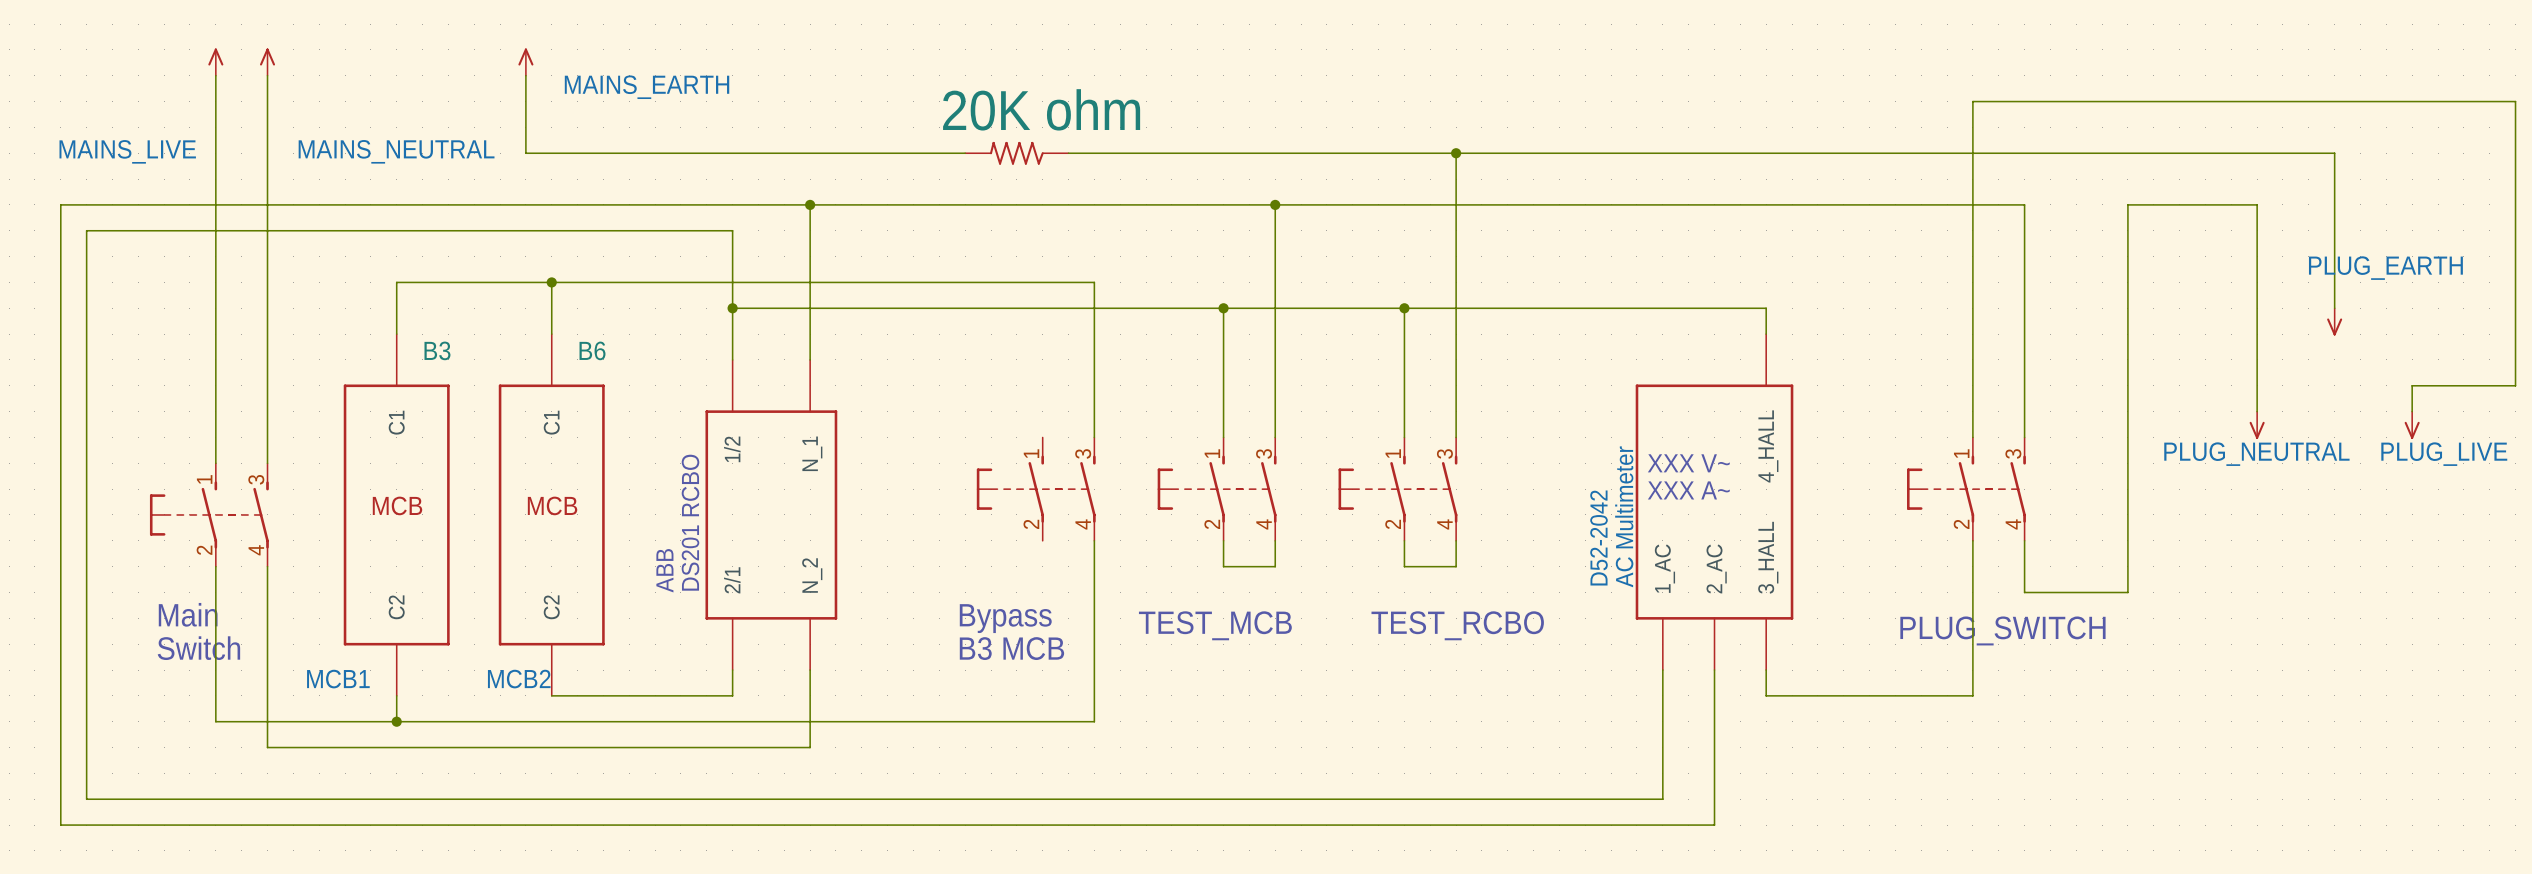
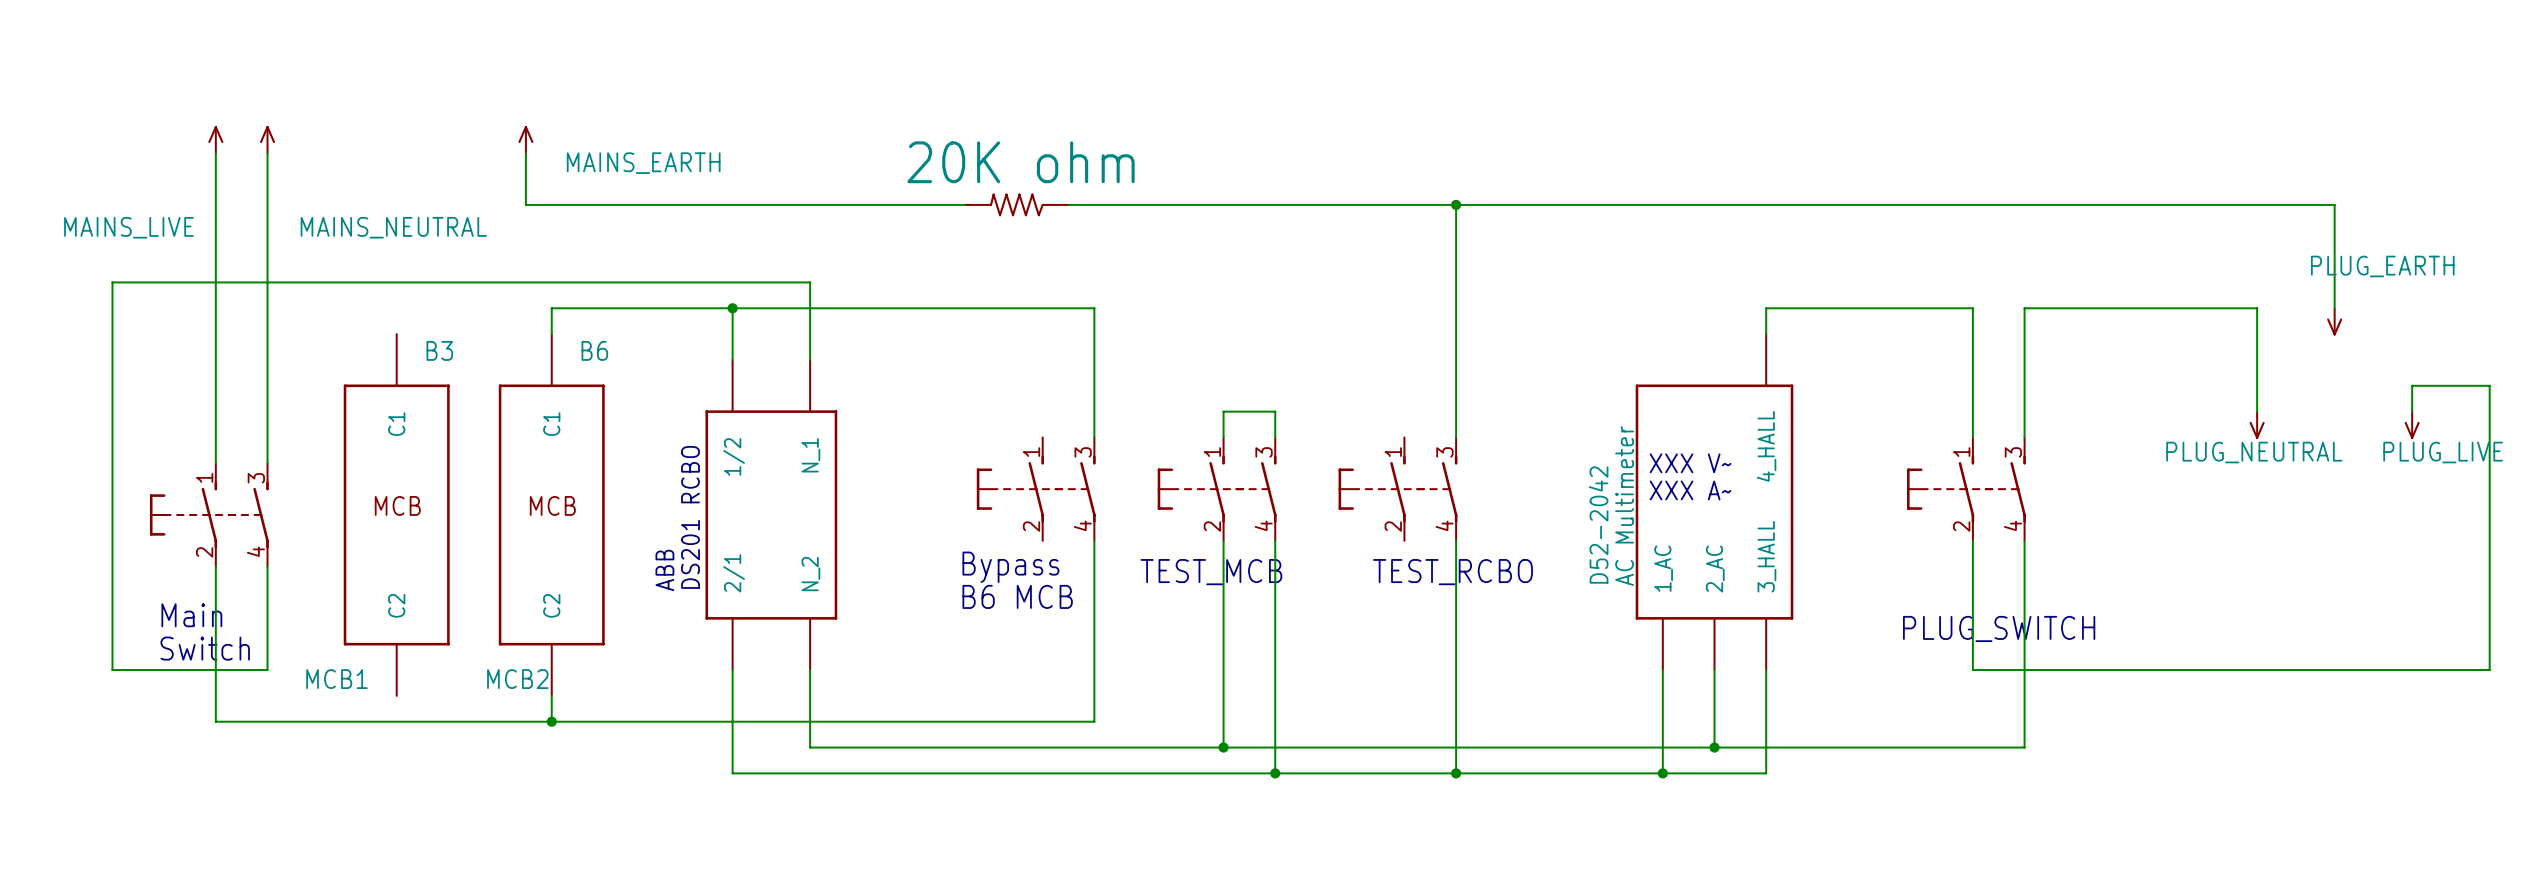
MAINS_LIVE position: (215, 62) -> (215, 139)
MAINS_NEUTRAL position: (267, 62) -> (267, 139)
MAINS_EARTH position: (525, 62) -> (525, 139)
wire: (215, 75) (215, 153) -> none
wire: (267, 75) (267, 153) -> none
wire: (525, 75) (525, 153) (965, 153) -> none
part position: (1016, 153) -> (1016, 204)
wire: (1068, 153) (2334, 153) (2334, 204) -> none
wire: (1456, 153) (1456, 204) -> none
junction position: (1456, 153) -> (1456, 204)
wire: (525, 204) (60, 204) (60, 825) (1714, 825) (1714, 747) -> (525, 204) (525, 153)
wire: (810, 204) (810, 282) (1094, 282) (1094, 308) (1766, 308) -> (1972, 308) (1766, 308)
junction: (810, 204) -> none
wire: (1275, 204) (1275, 411) -> none
junction: (1275, 204) -> none
wire: (2024, 204) (2024, 308) -> (2024, 204) (2127, 204)
wire: (2127, 204) (2127, 592) (2024, 592) -> (810, 747) (2024, 747) (2024, 592)
wire: (2257, 204) (2257, 308) -> (2257, 204) (2334, 204)
wire: (396, 282) (396, 334) -> (396, 282) (112, 282) (112, 670) (267, 670)
wire: (551, 282) (551, 308) -> (732, 308) (551, 308)
junction: (551, 282) -> none
wire: (732, 308) (732, 230) (86, 230) (86, 799) (1662, 799) (1662, 773) -> none
wire: (1223, 308) (1223, 411) -> (1275, 411) (1223, 411)
junction: (1223, 308) -> none
wire: (1404, 308) (1404, 437) -> none
junction: (1404, 308) -> none
wire: (1972, 308) (1972, 101) (2515, 101) (2515, 385) (2489, 385) -> (1972, 670) (2489, 670) (2489, 385)
wire: none -> (2024, 308) (2257, 308)
wire: (1404, 540) (1404, 566) (1456, 566) -> (1456, 773) (1456, 566)
wire: (1223, 566) (1275, 566) -> (1223, 566) (1223, 747)
wire: none -> (1275, 566) (1275, 773)
text: none -> B6 MCB (1017, 596)
text position: Bypass (1005, 618) -> Bypass (1010, 567)
text position: TEST_MCB (1215, 625) -> TEST_MCB (1211, 572)
text position: TEST_RCBO (1457, 625) -> TEST_RCBO (1452, 572)
text: B3 MCB (1011, 648) -> none
wire: (267, 670) (267, 747) (810, 747) -> none
wire: (1972, 670) (1972, 695) (1766, 695) -> (732, 695) (732, 773) (1766, 773) (1766, 695)
wire: (396, 695) (396, 721) -> none
wire: (551, 695) (732, 695) -> (551, 695) (551, 721)
junction: (396, 721) -> none
junction: none -> (551, 721)
junction: none -> (1223, 747)
junction: none -> (1714, 747)
junction: none -> (1275, 773)
junction: none -> (1456, 773)
junction: none -> (1662, 773)

